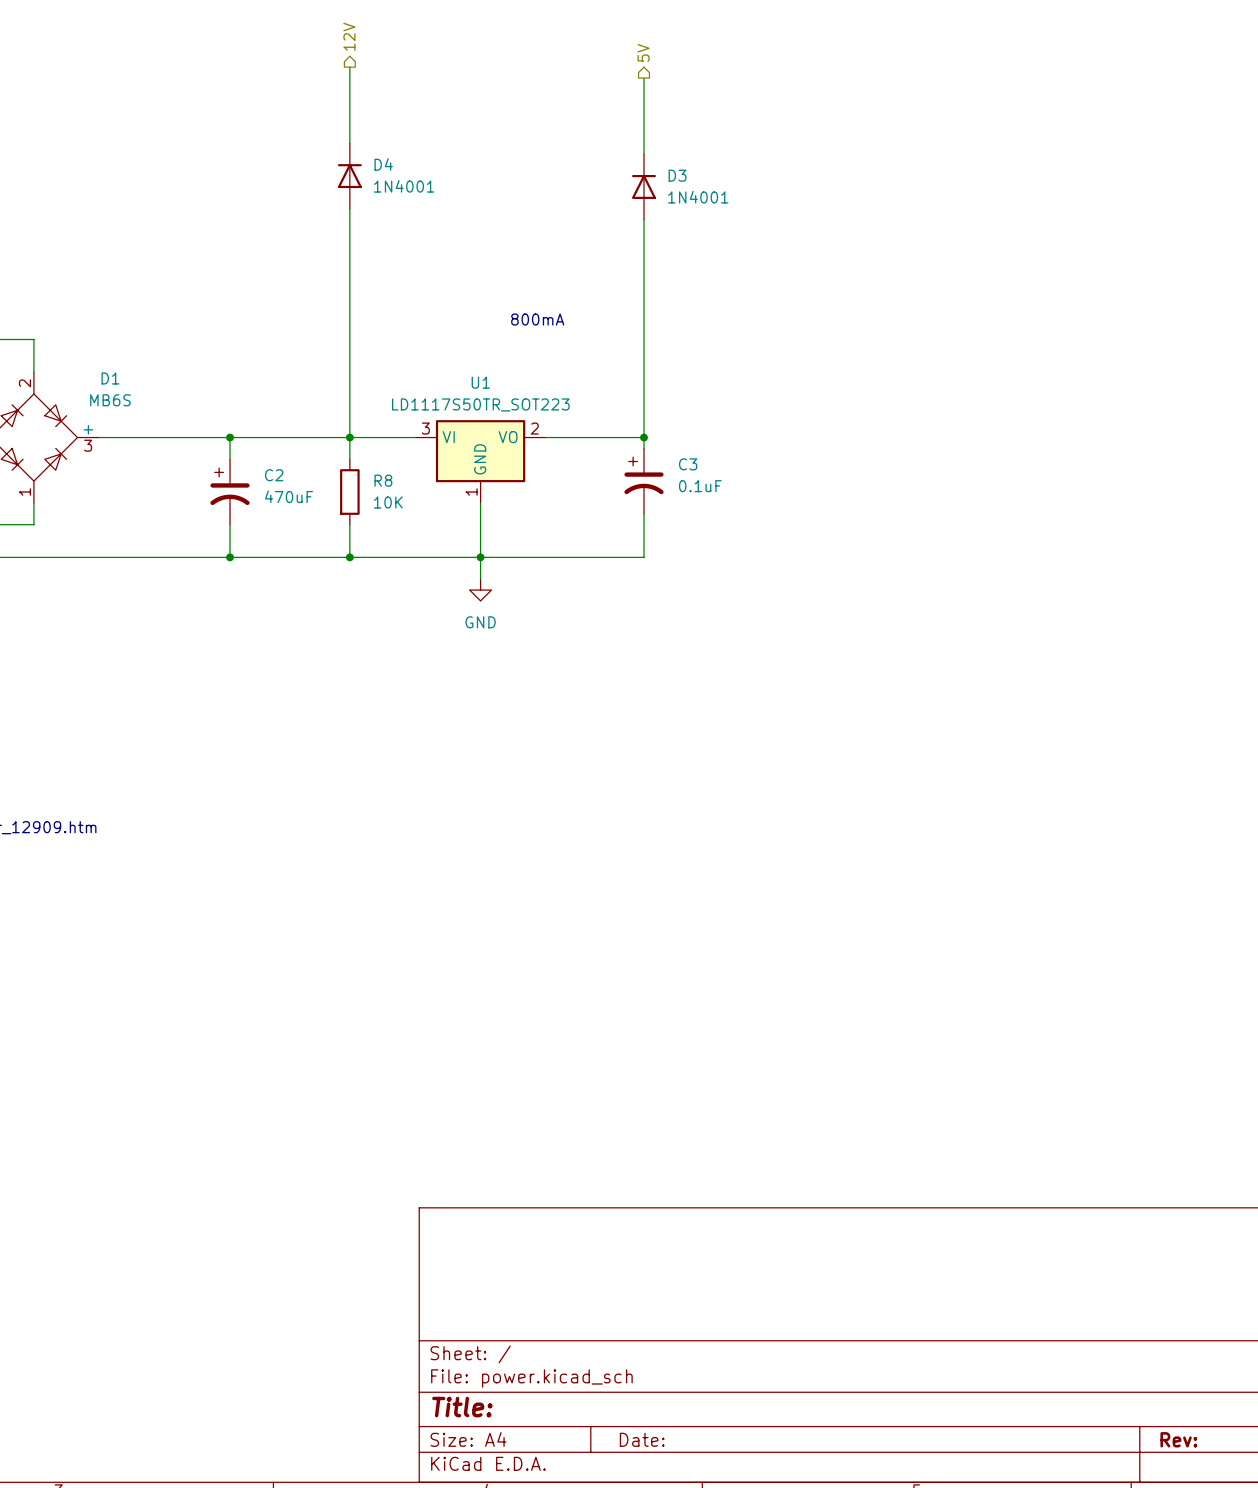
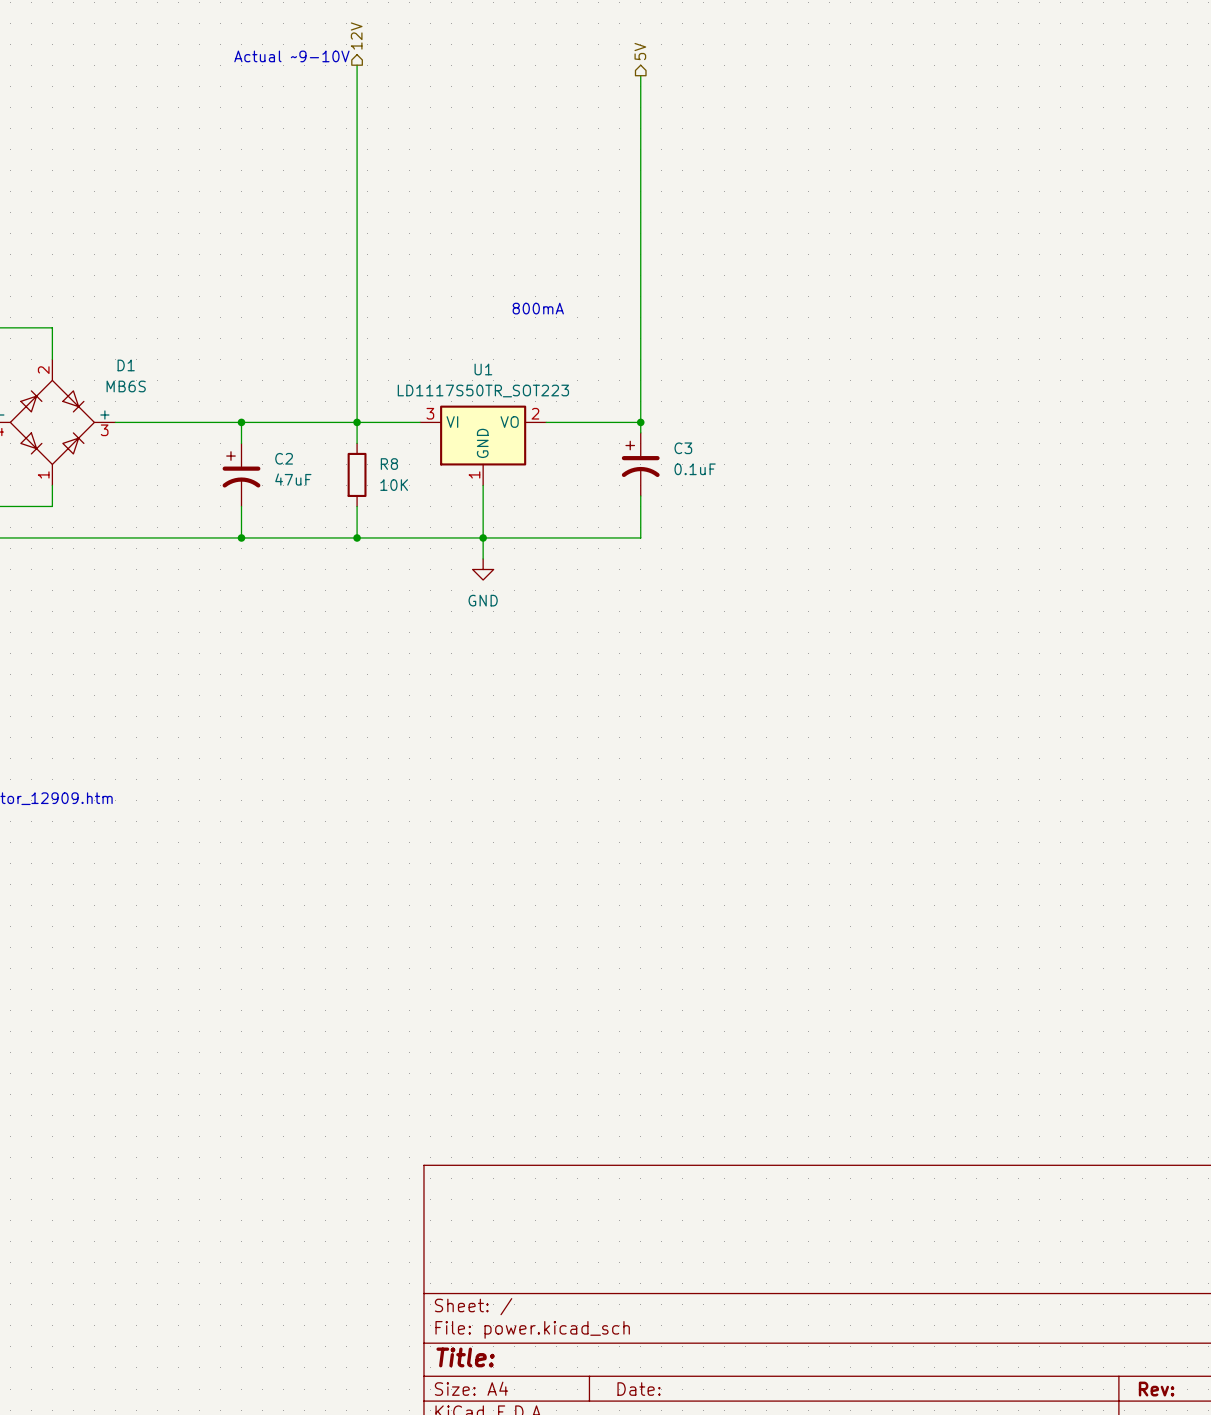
text: none -> Actual ~9-10V (291, 56)
D4: 1N4001 (349, 176) -> none
D3: 1N4001 (643, 186) -> none
C2 value: 470uF (288, 496) -> 47uF (293, 479)

